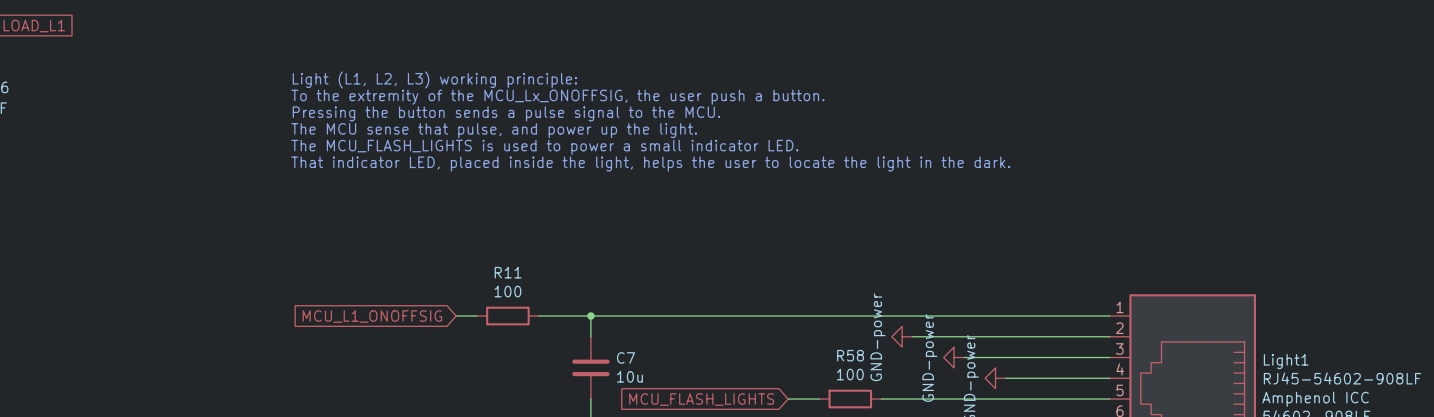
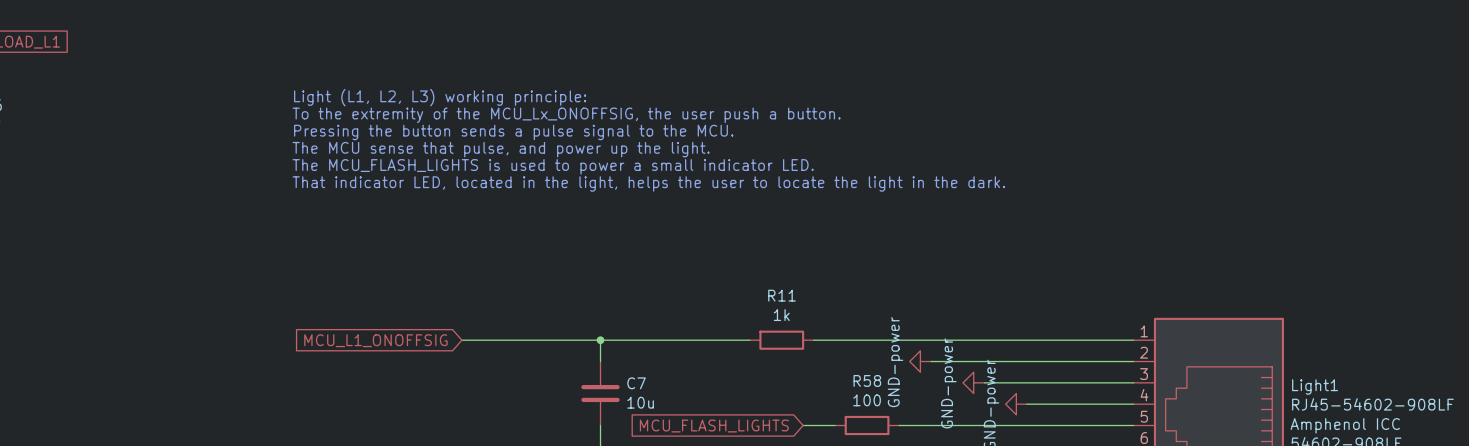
text: That indicator LED, placed inside the light, helps the user to locate the light in the dark. (650, 164) -> That indicator LED, located in the light, helps the user to locate the light in the dark. (648, 183)
R11 value: 100 (507, 291) -> 1k (781, 315)
wire: none -> (483, 340) (547, 340)
R11 position: (507, 316) -> (781, 340)
wire: (736, 316) (798, 316) -> none

